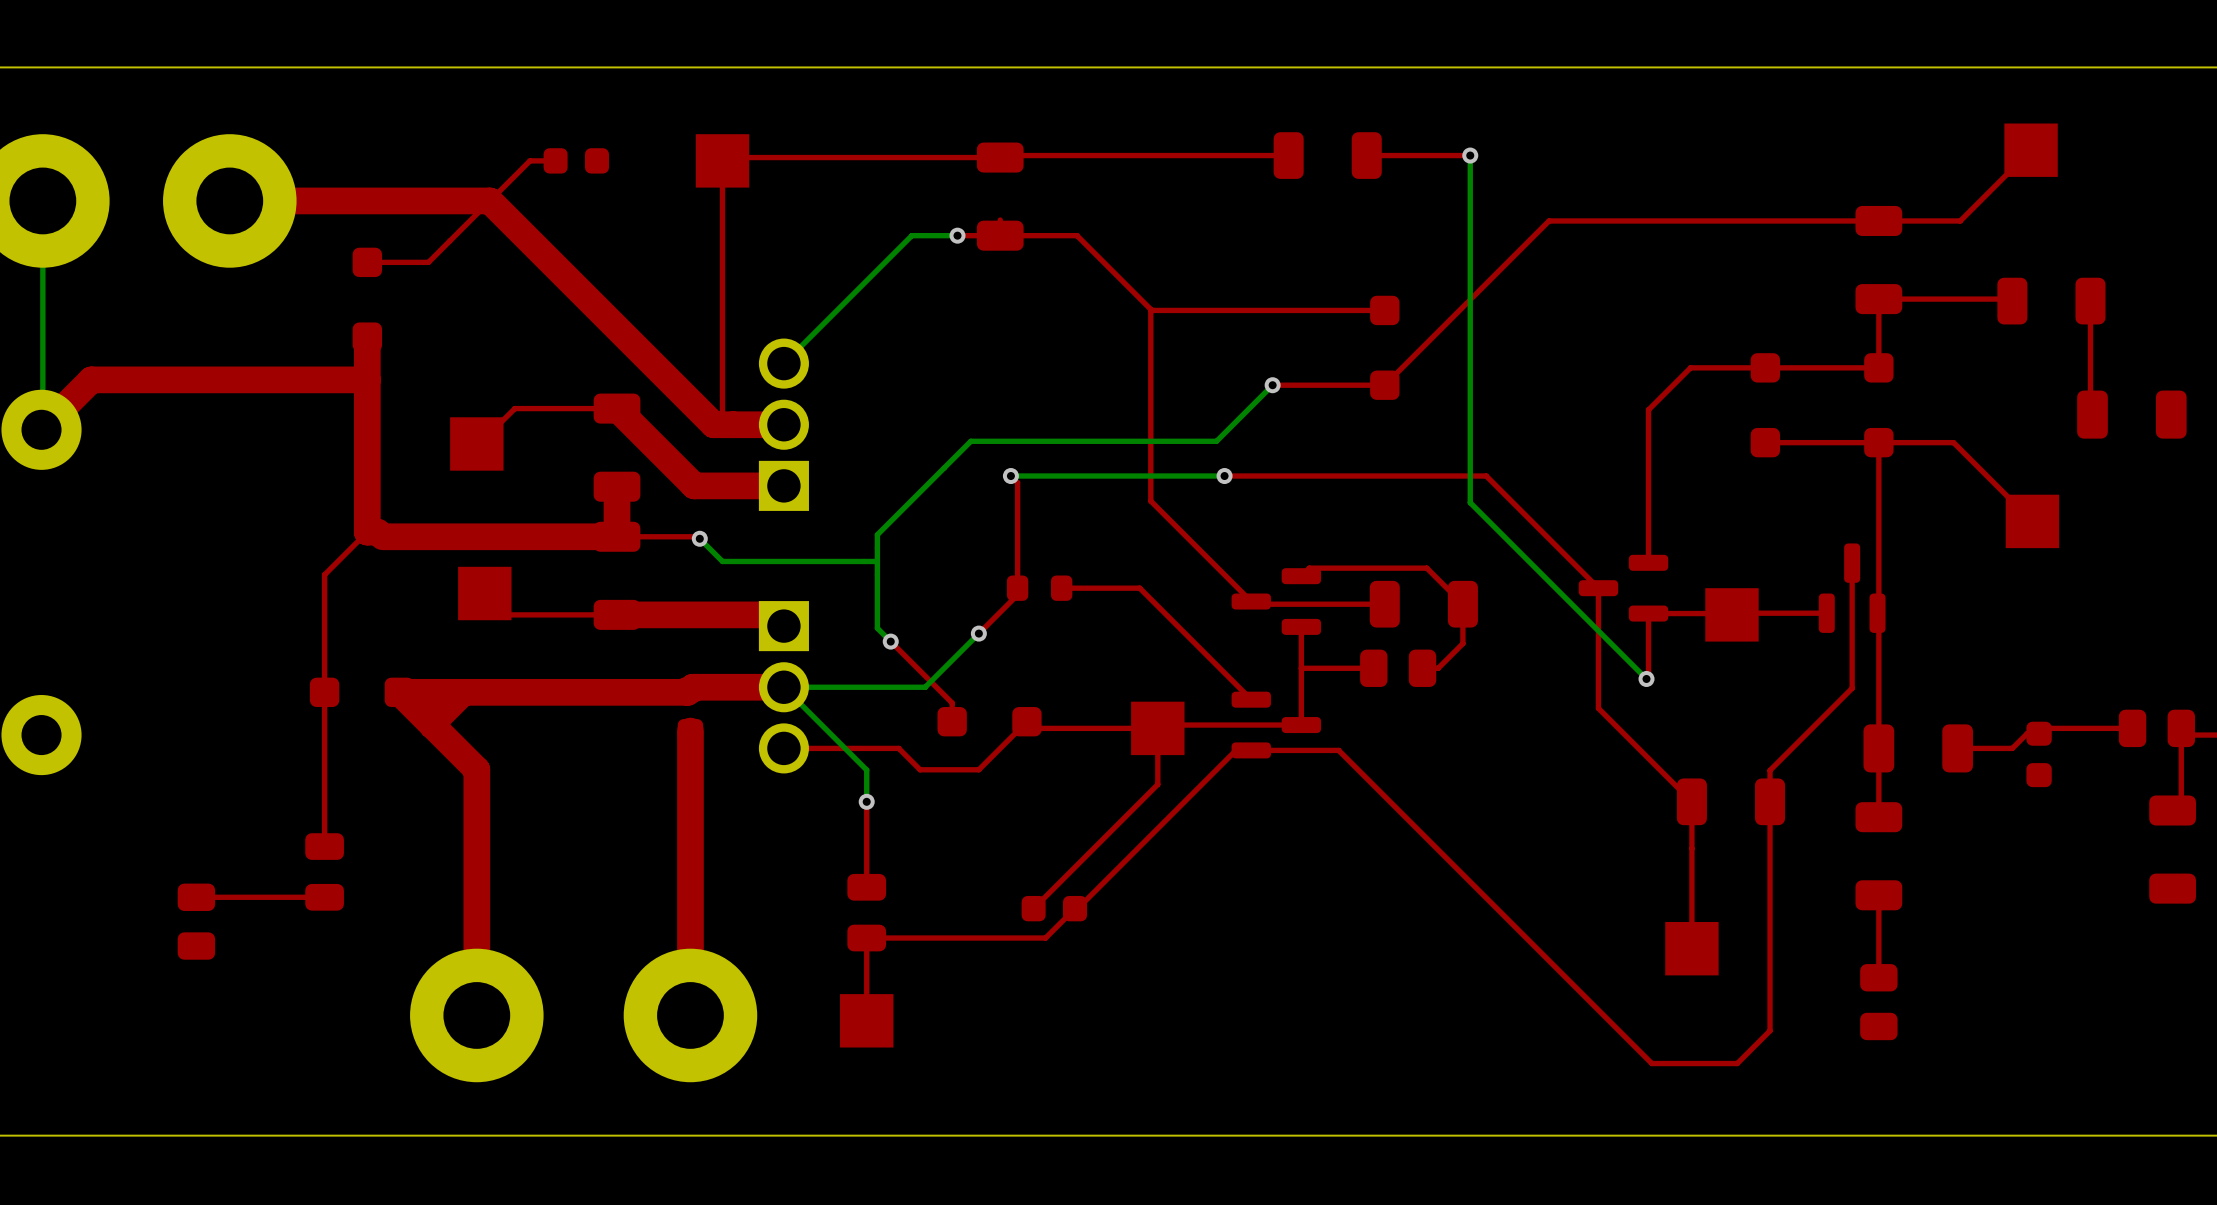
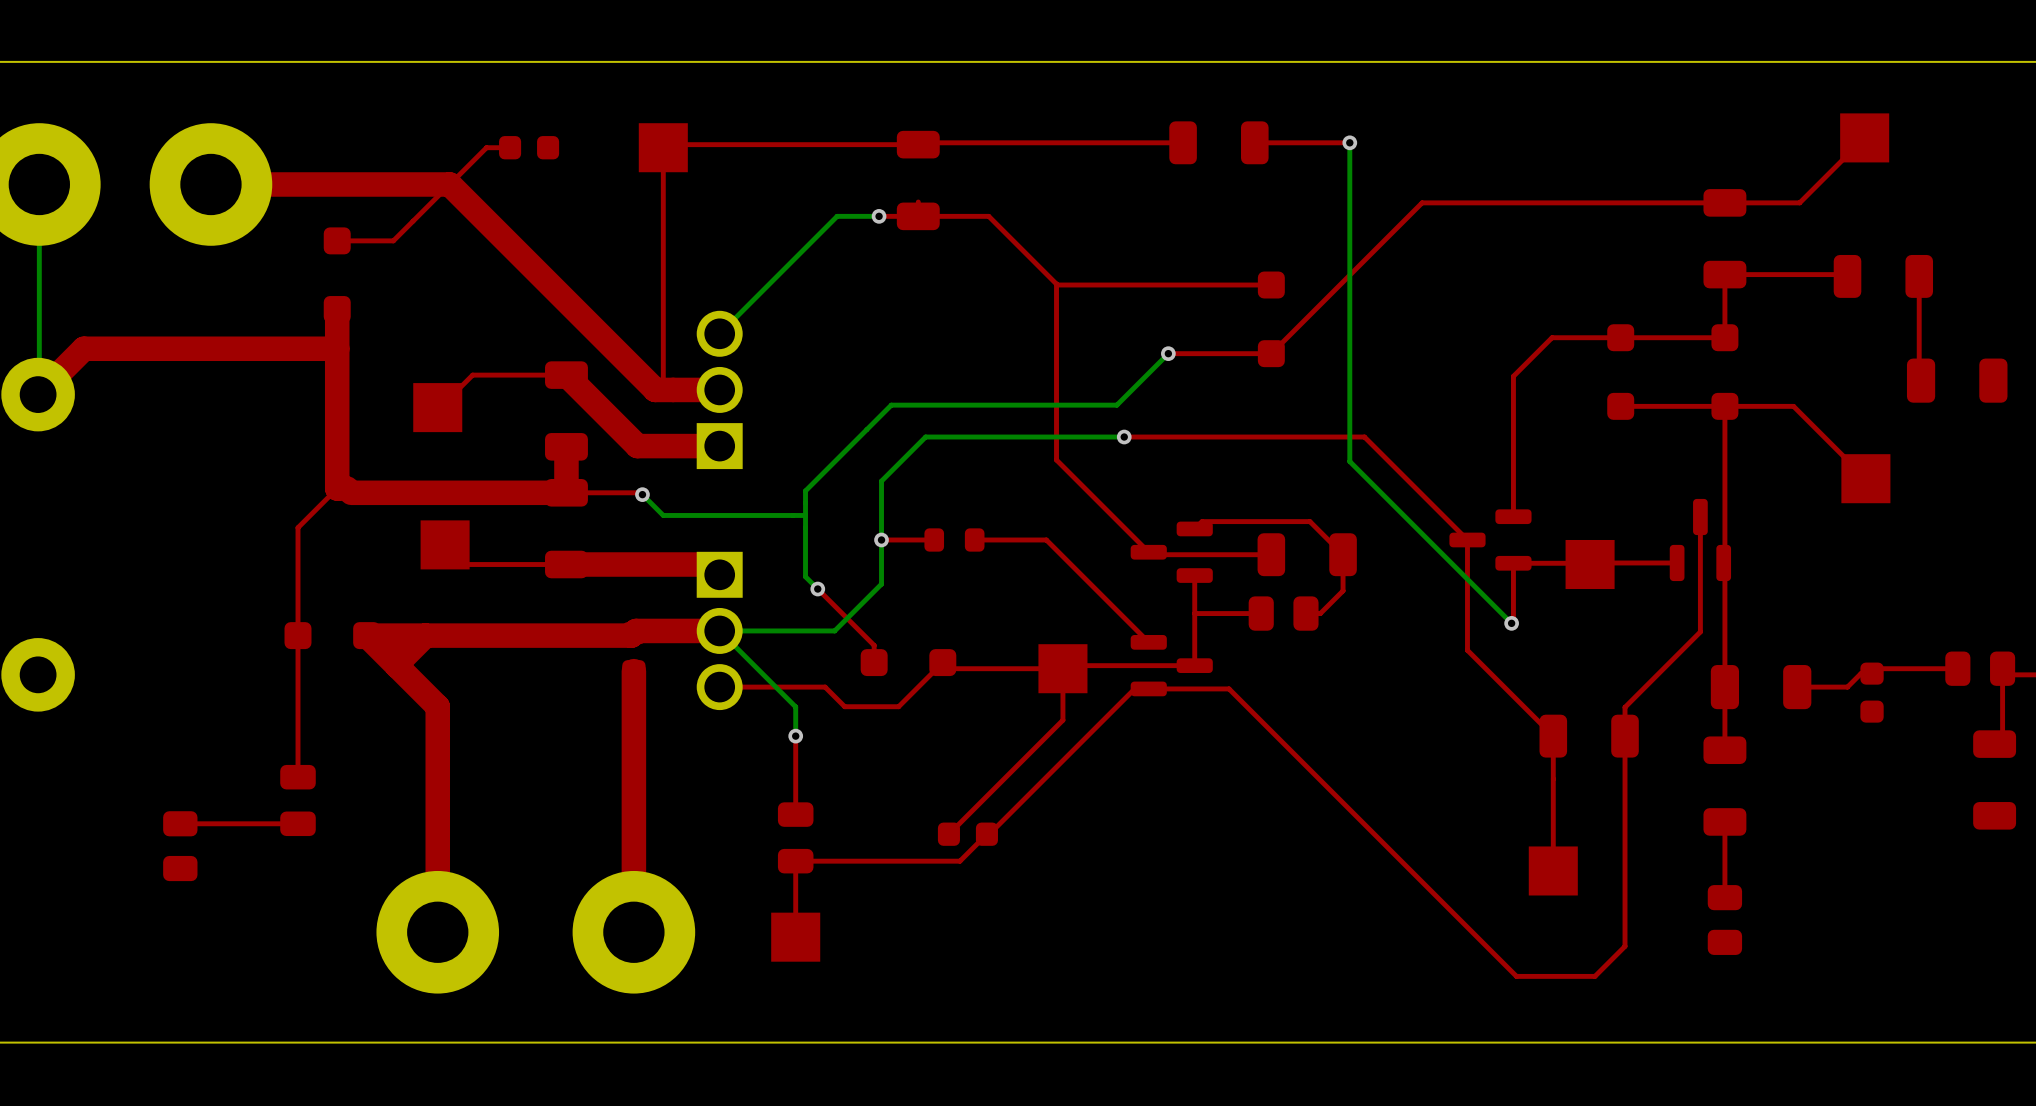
top track: (1010, 476) (1017, 482) (1017, 588) -> (881, 539) (934, 539)
via: (1010, 476) -> none
top track: (1017, 594) (978, 633) -> none
bottom track: (978, 633) (925, 687) (909, 687) -> (928, 437) (925, 437) (881, 481) (881, 584) (834, 630)
via position: (978, 633) -> (881, 539)

